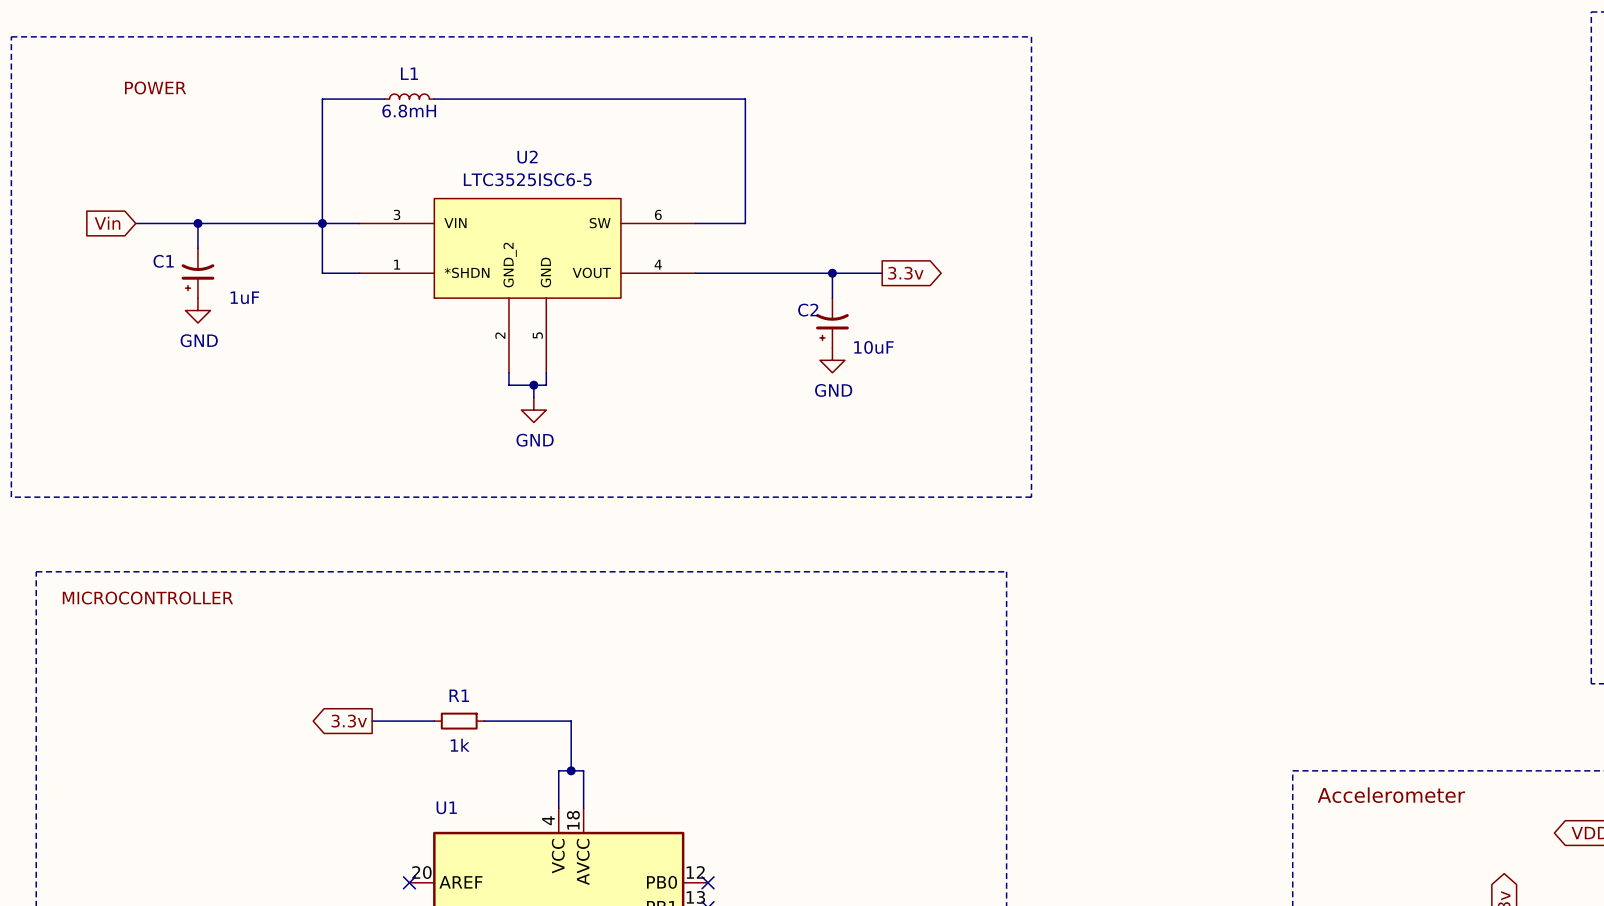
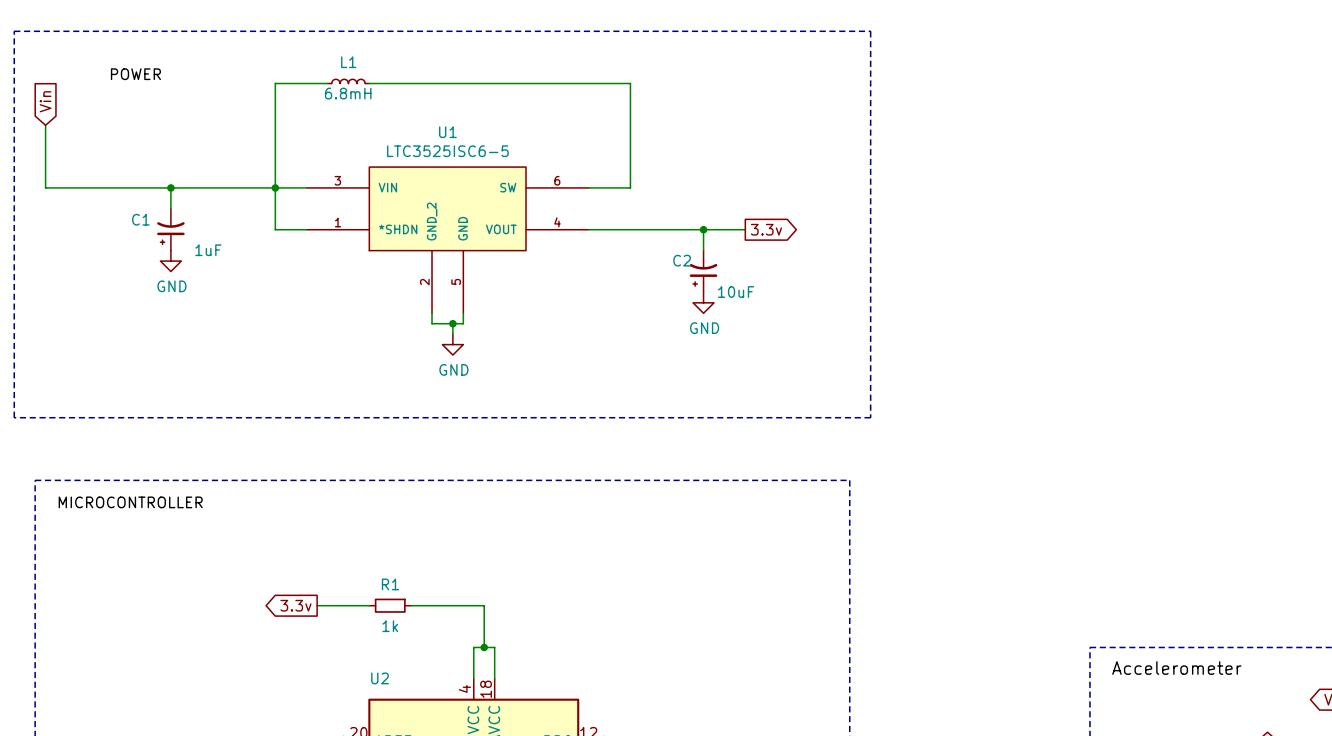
wire: none -> (45, 125) (45, 187) (118, 187)
U2 name: U2 (527, 157) -> U1 (447, 132)
global label rotation: 0° (107, 223) -> 90° clockwise (45, 101)
global label position: Vin (107, 223) -> Vin (45, 101)
U1 name: U1 (446, 807) -> U2 (380, 678)

